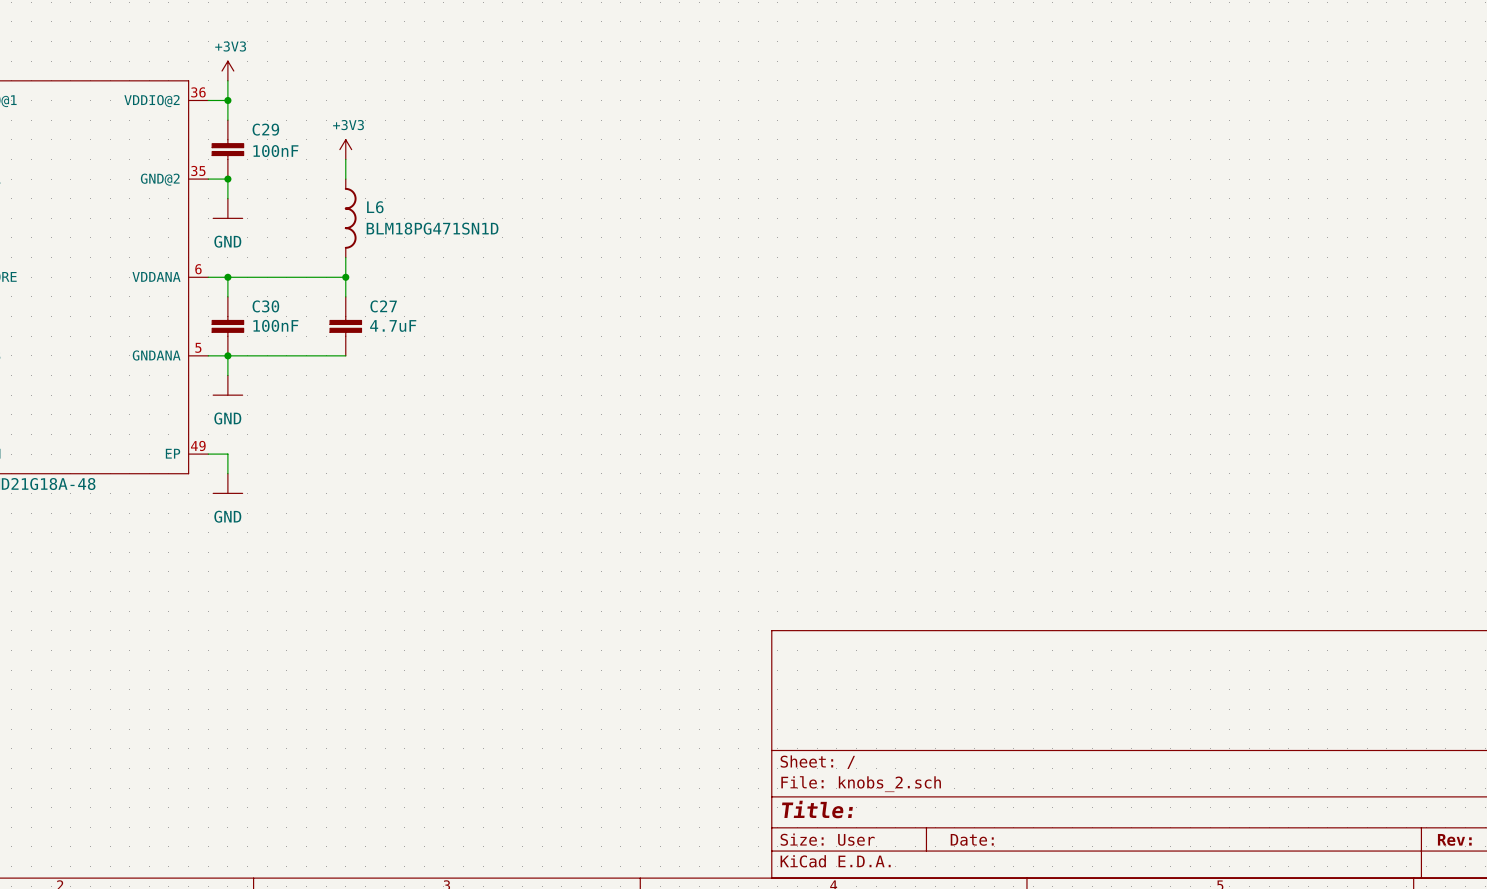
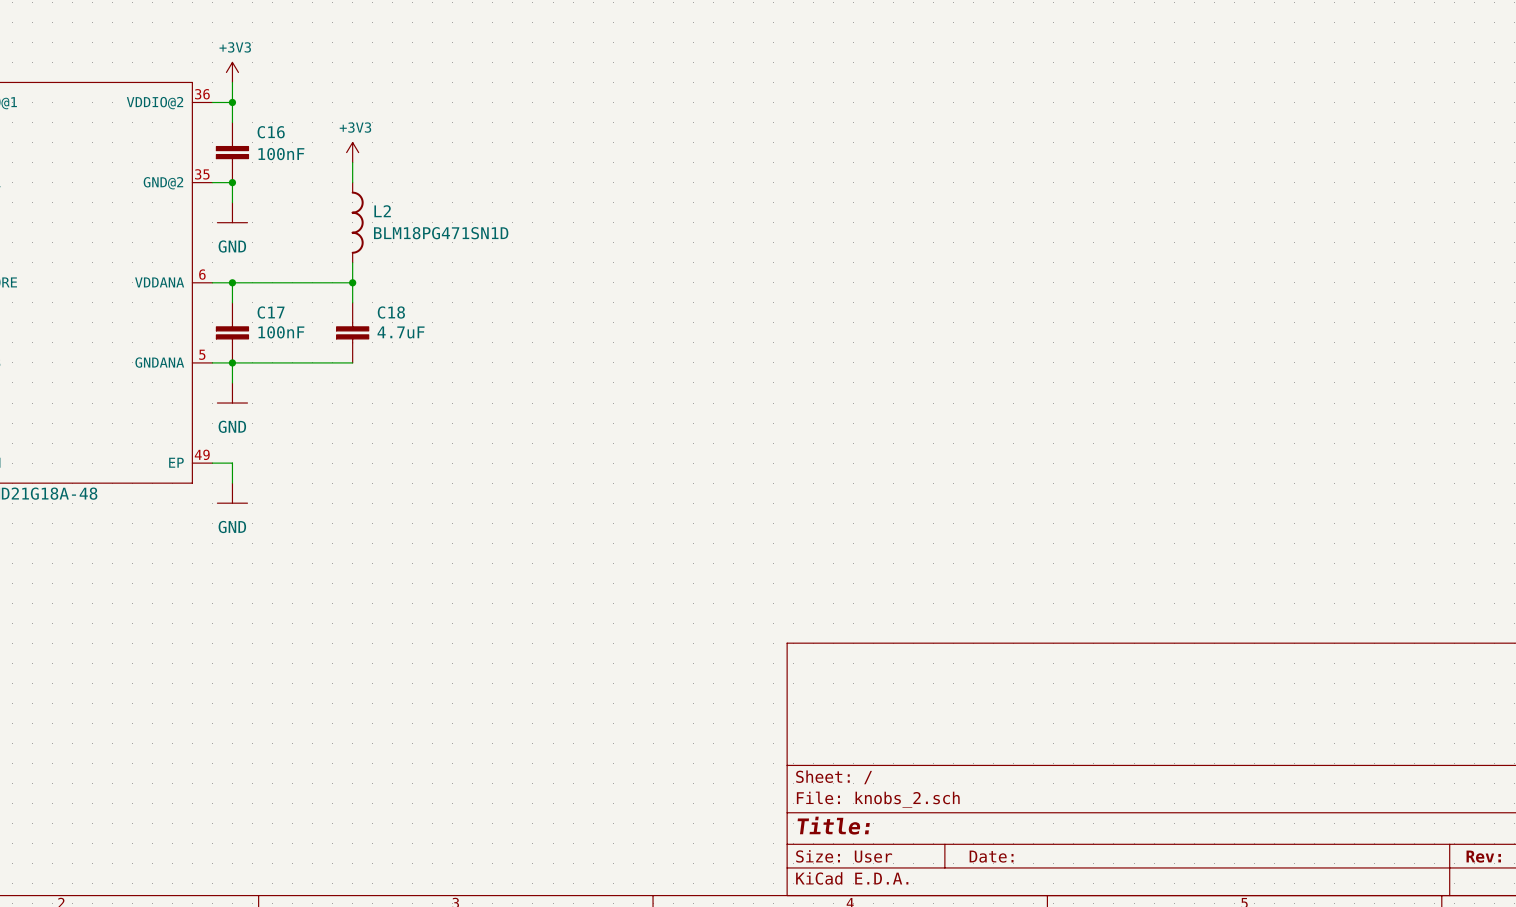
C29 name: C29 (265, 129) -> C16 (271, 132)
L6 name: L6 (375, 207) -> L2 (382, 211)
C30 name: C30 (265, 306) -> C17 (271, 312)
C27 name: C27 (383, 306) -> C18 (391, 312)

